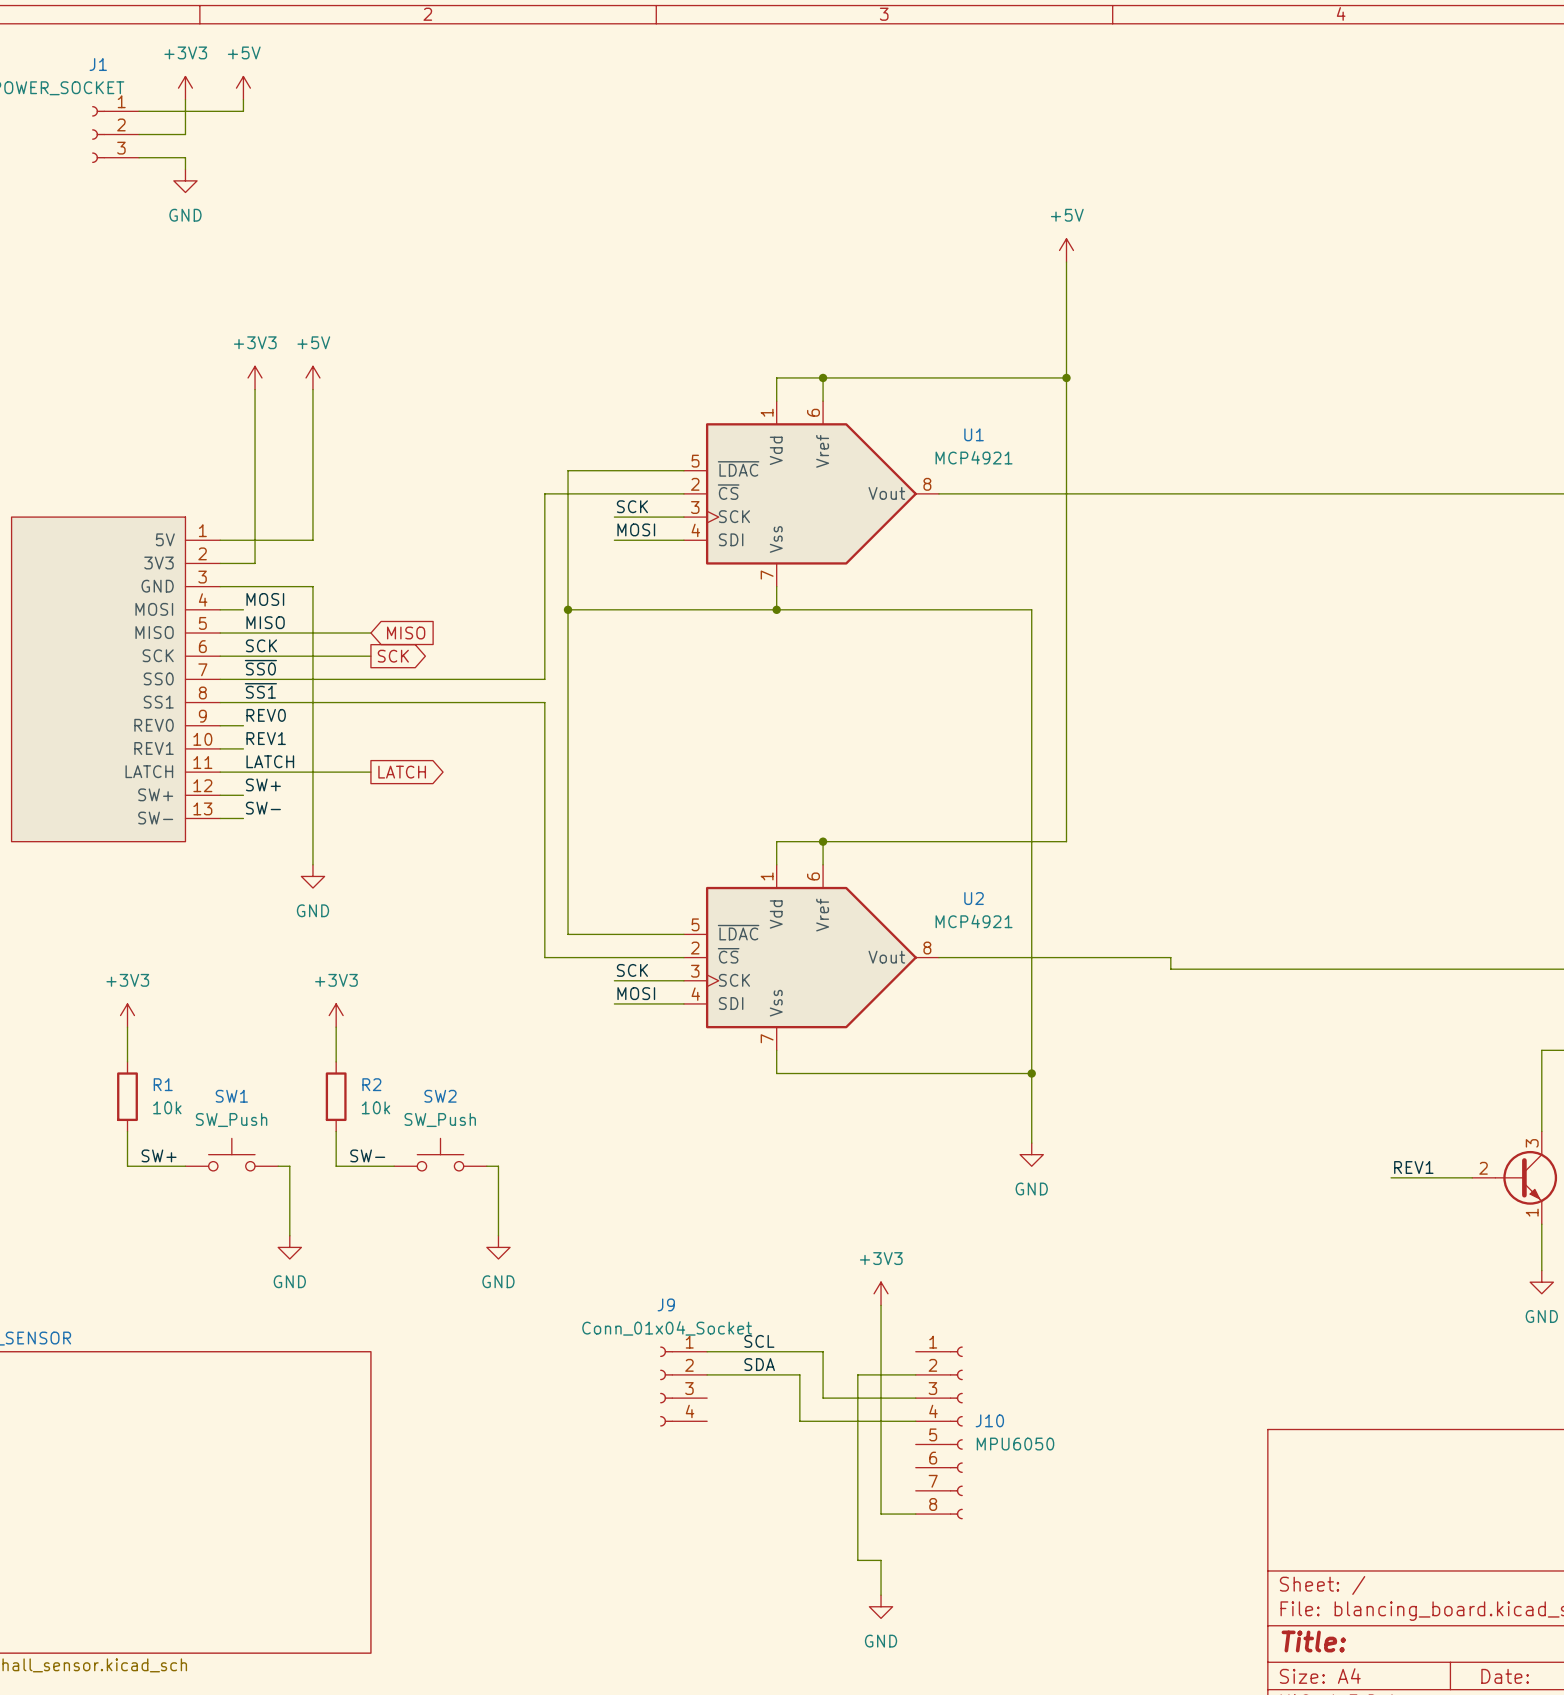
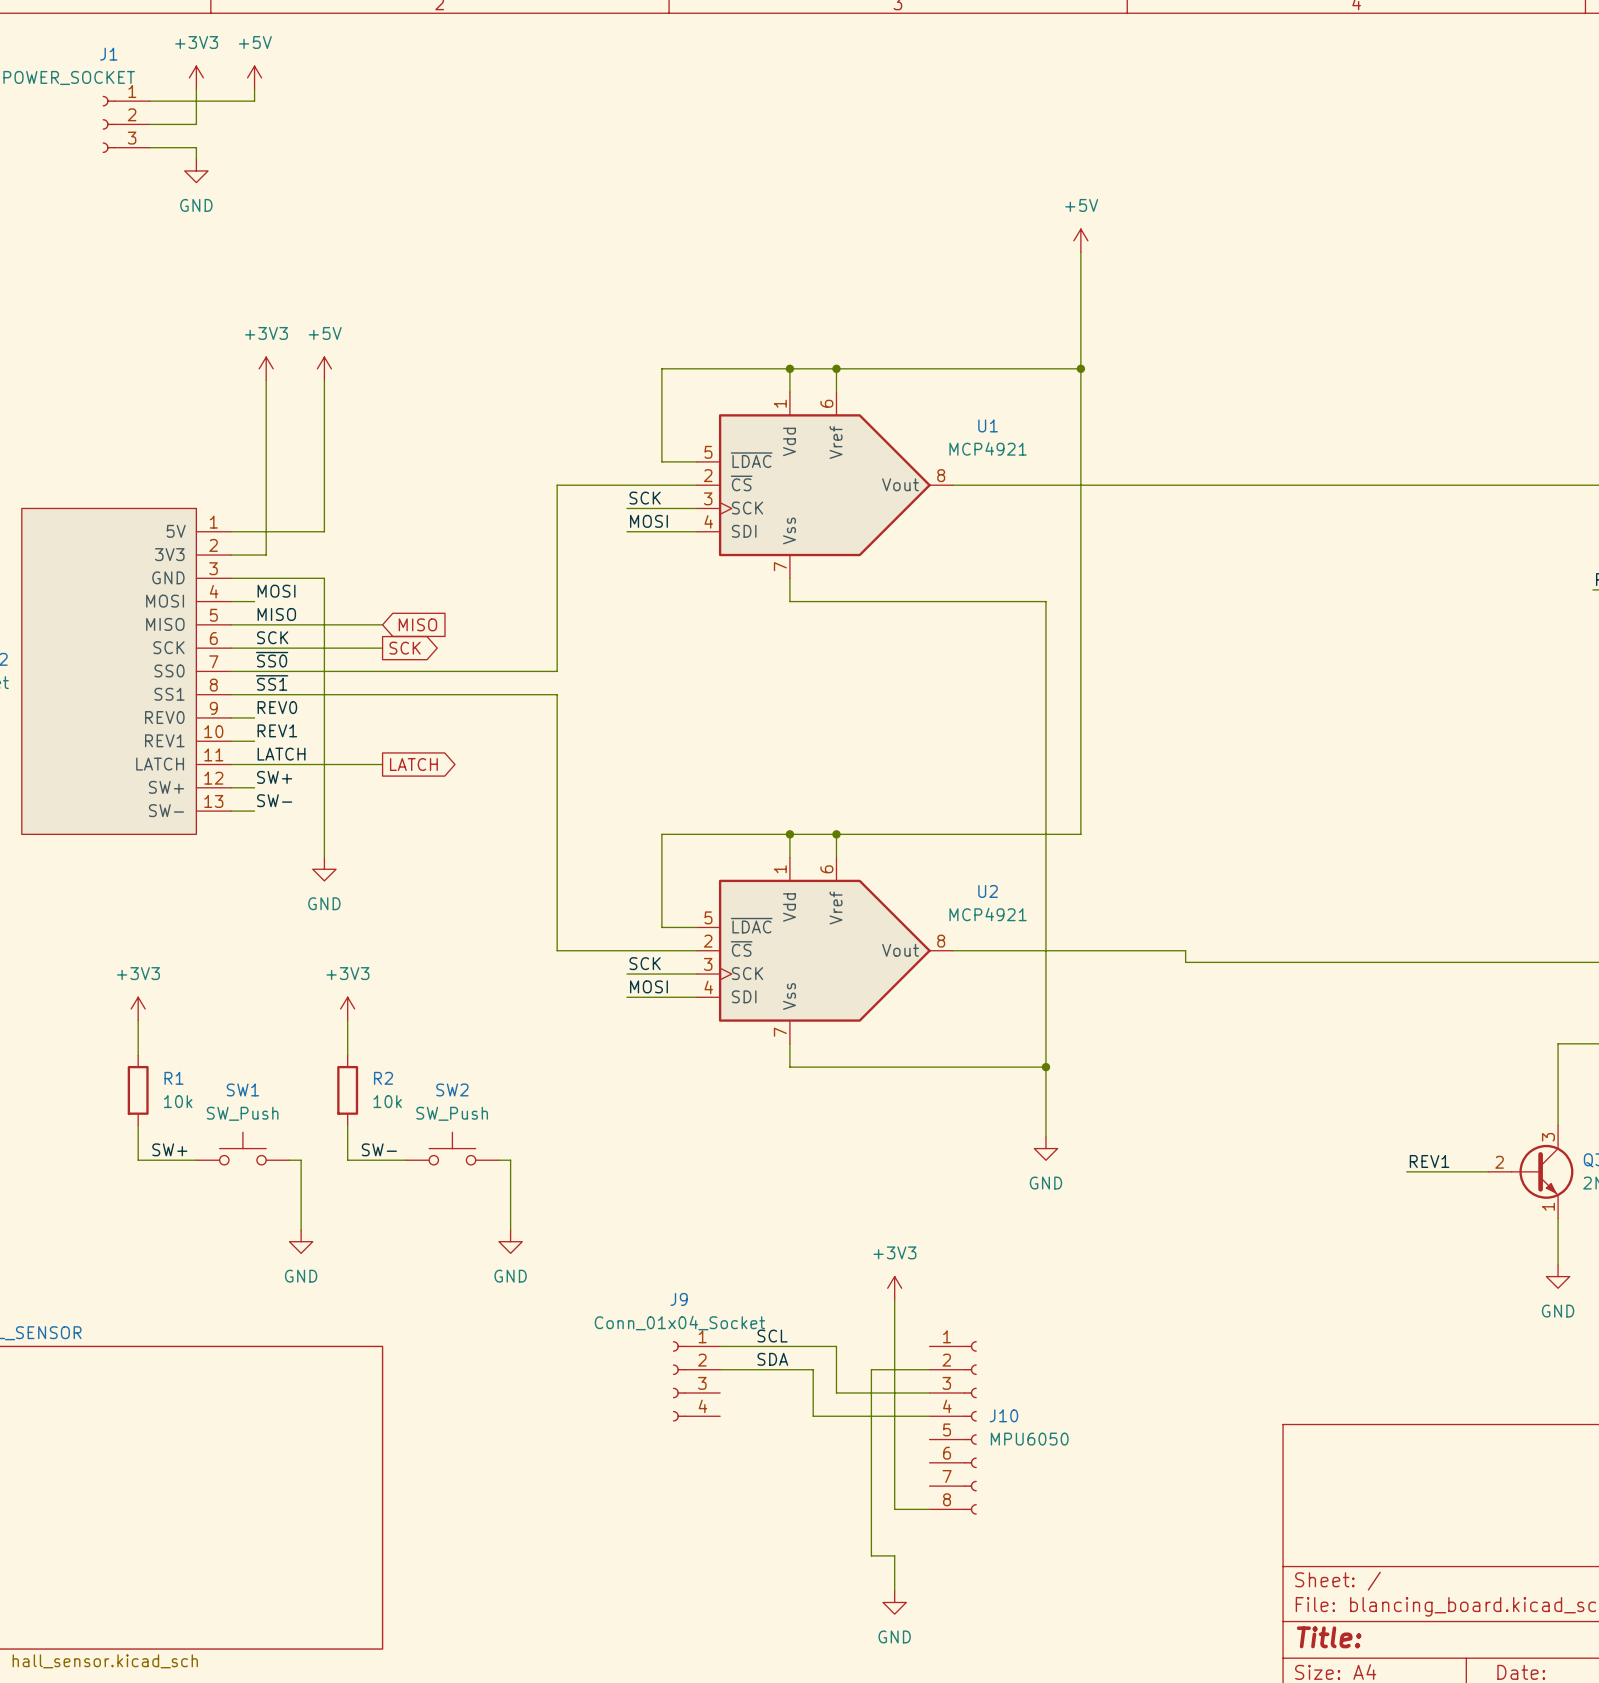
wire: none -> (789, 368) (661, 368) (661, 461)
junction: none -> (789, 368)
wire: (649, 470) (568, 470) (568, 934) (649, 934) -> (789, 834) (661, 834) (661, 927)
wire: (568, 609) (776, 609) -> none
junction: (568, 609) -> none
junction: (776, 609) -> none
junction: none -> (789, 834)

